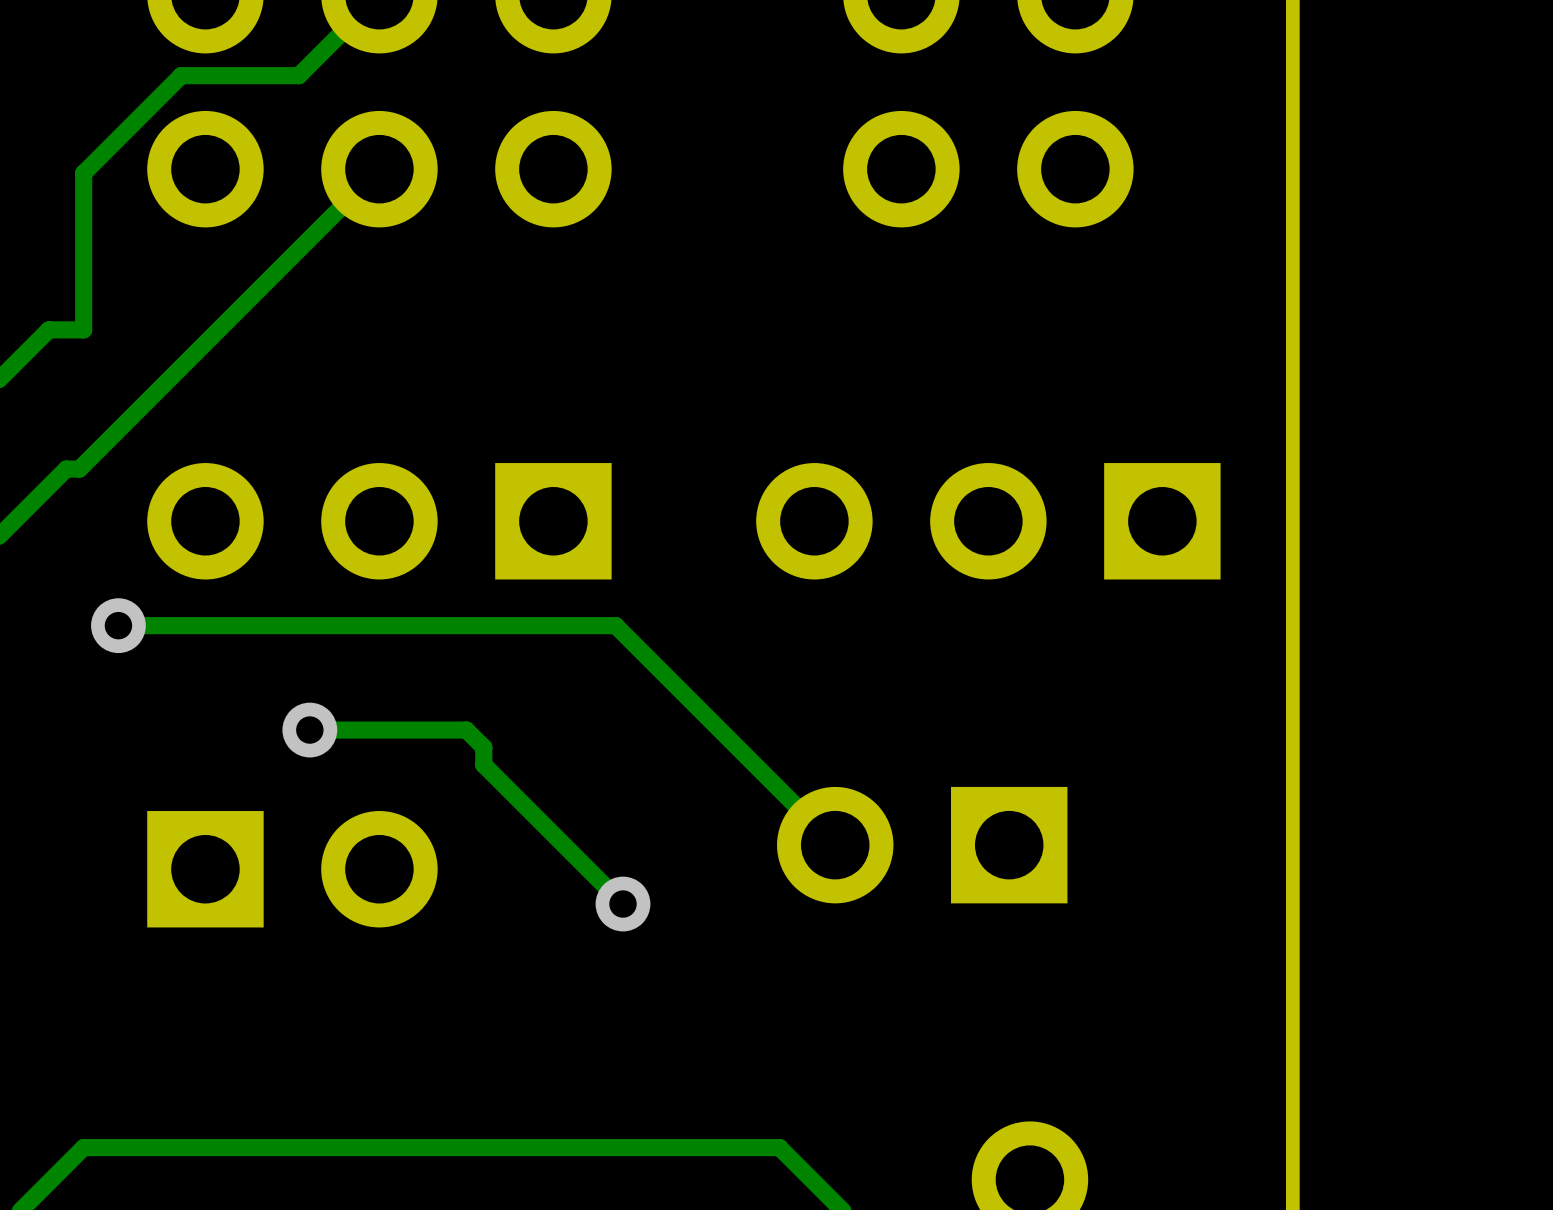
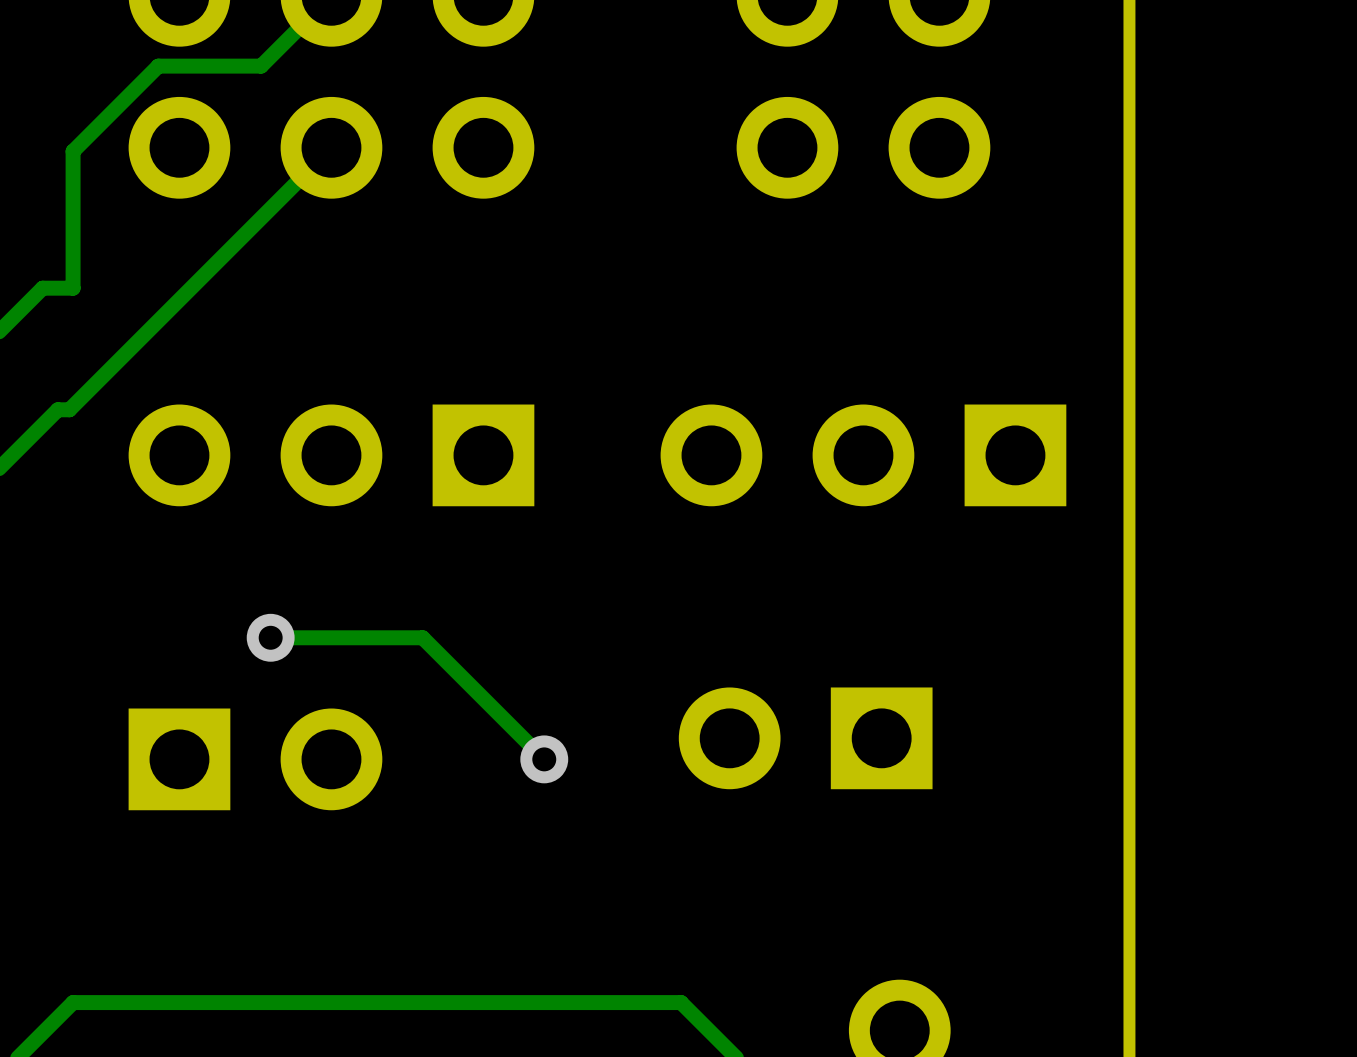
track: (118, 625) (615, 625) (835, 845) -> none
via: (118, 625) -> none
track: (466, 730) (483, 747) (483, 764) (623, 904) -> (407, 637) (422, 637) (544, 759)
via position: (623, 904) -> (544, 759)

